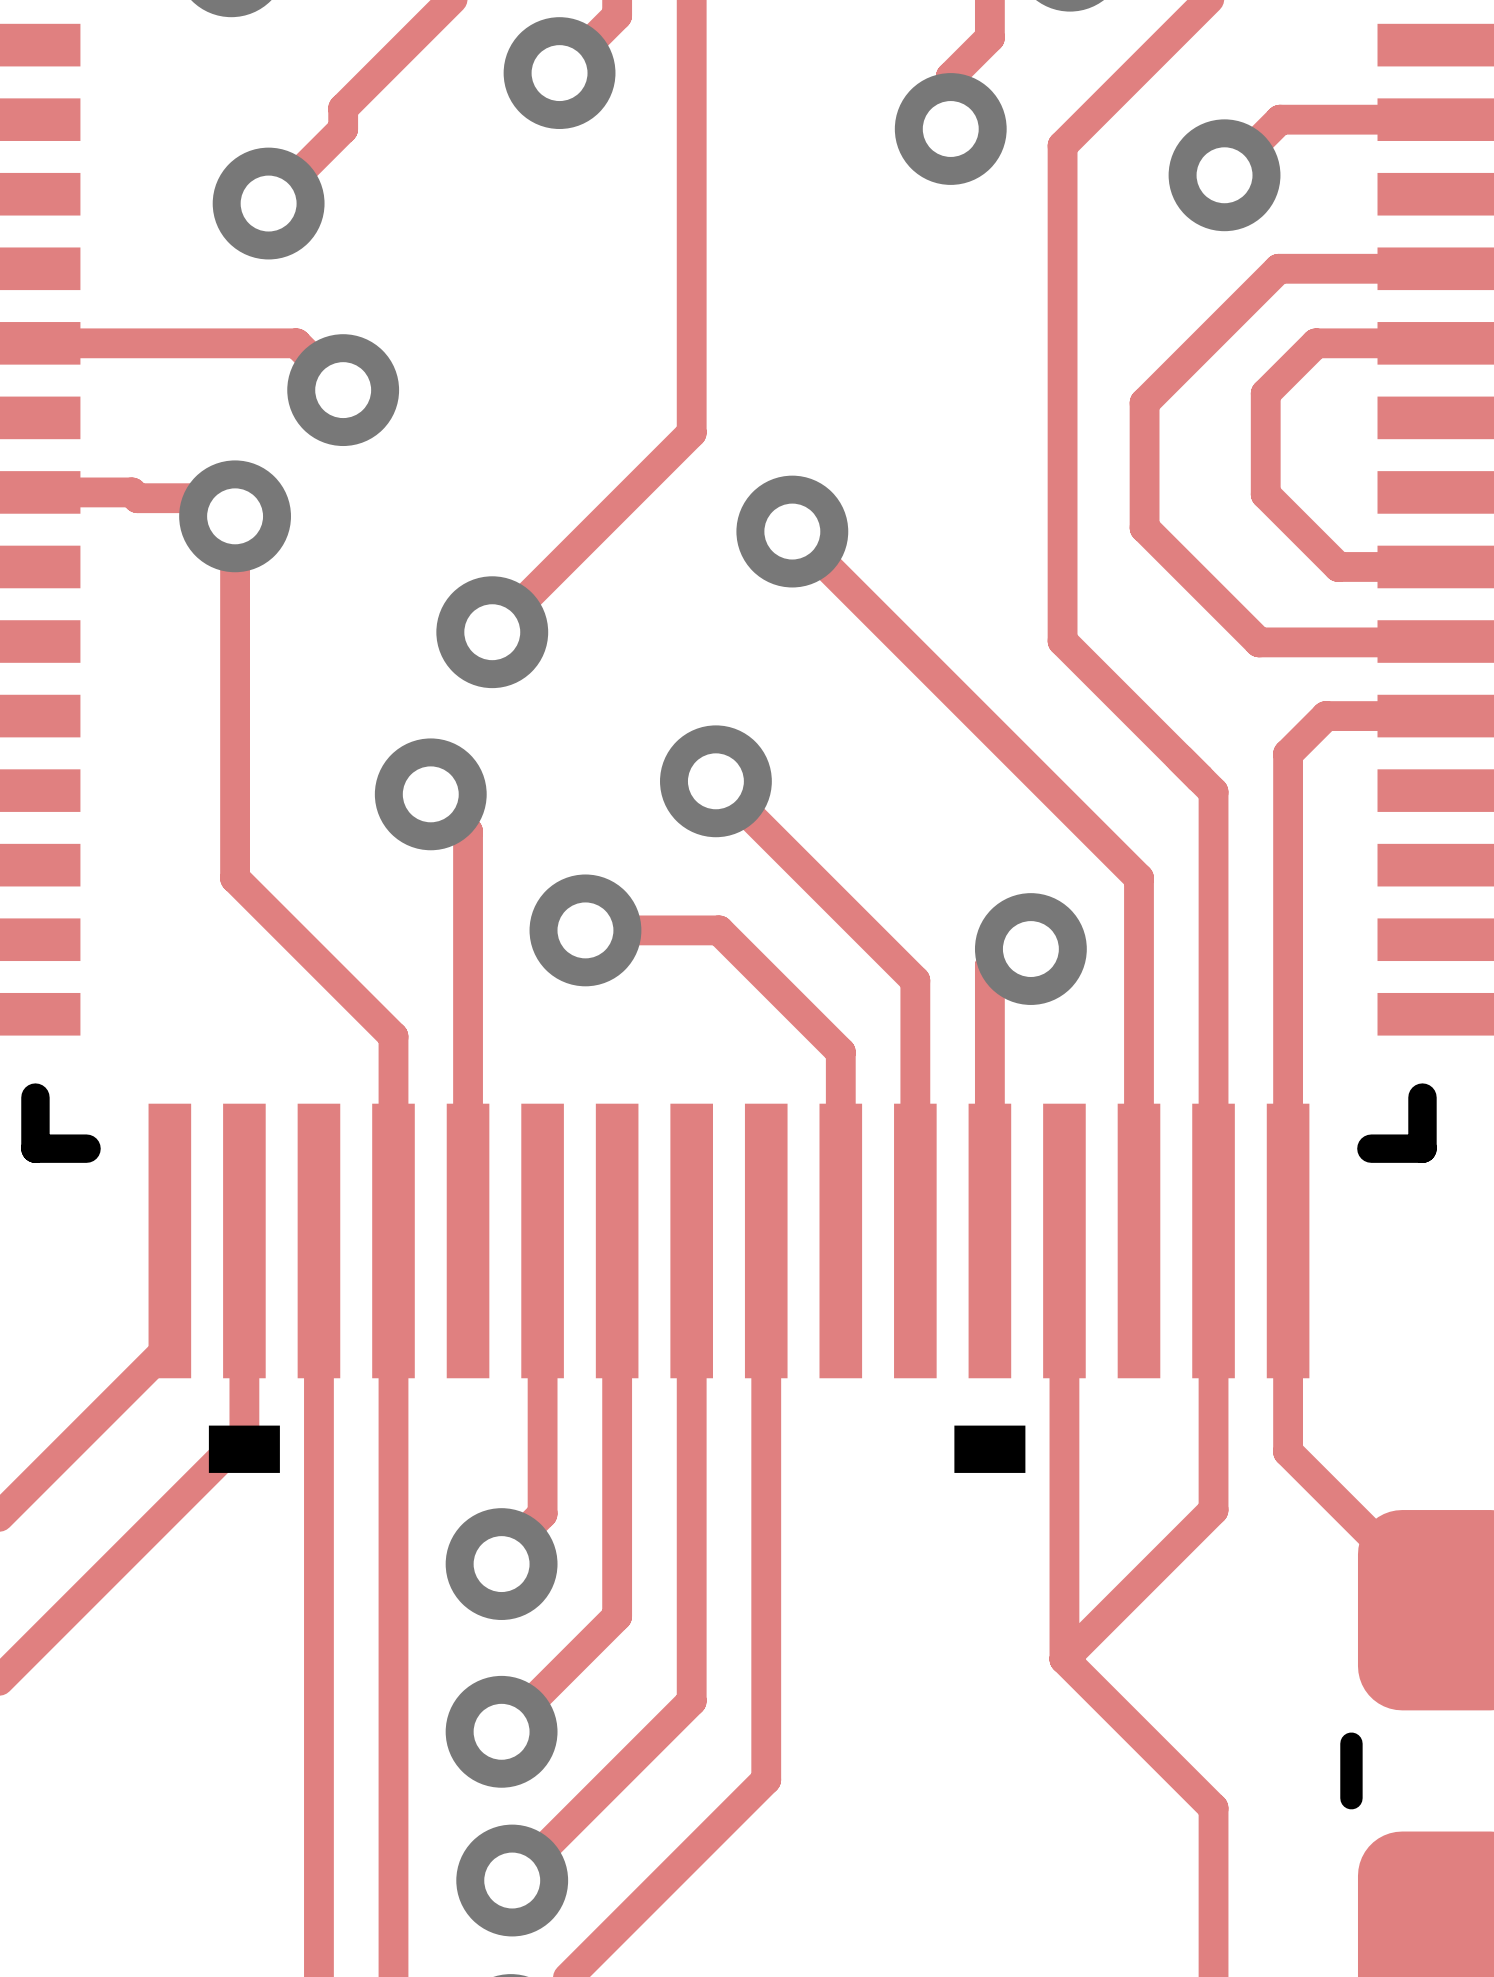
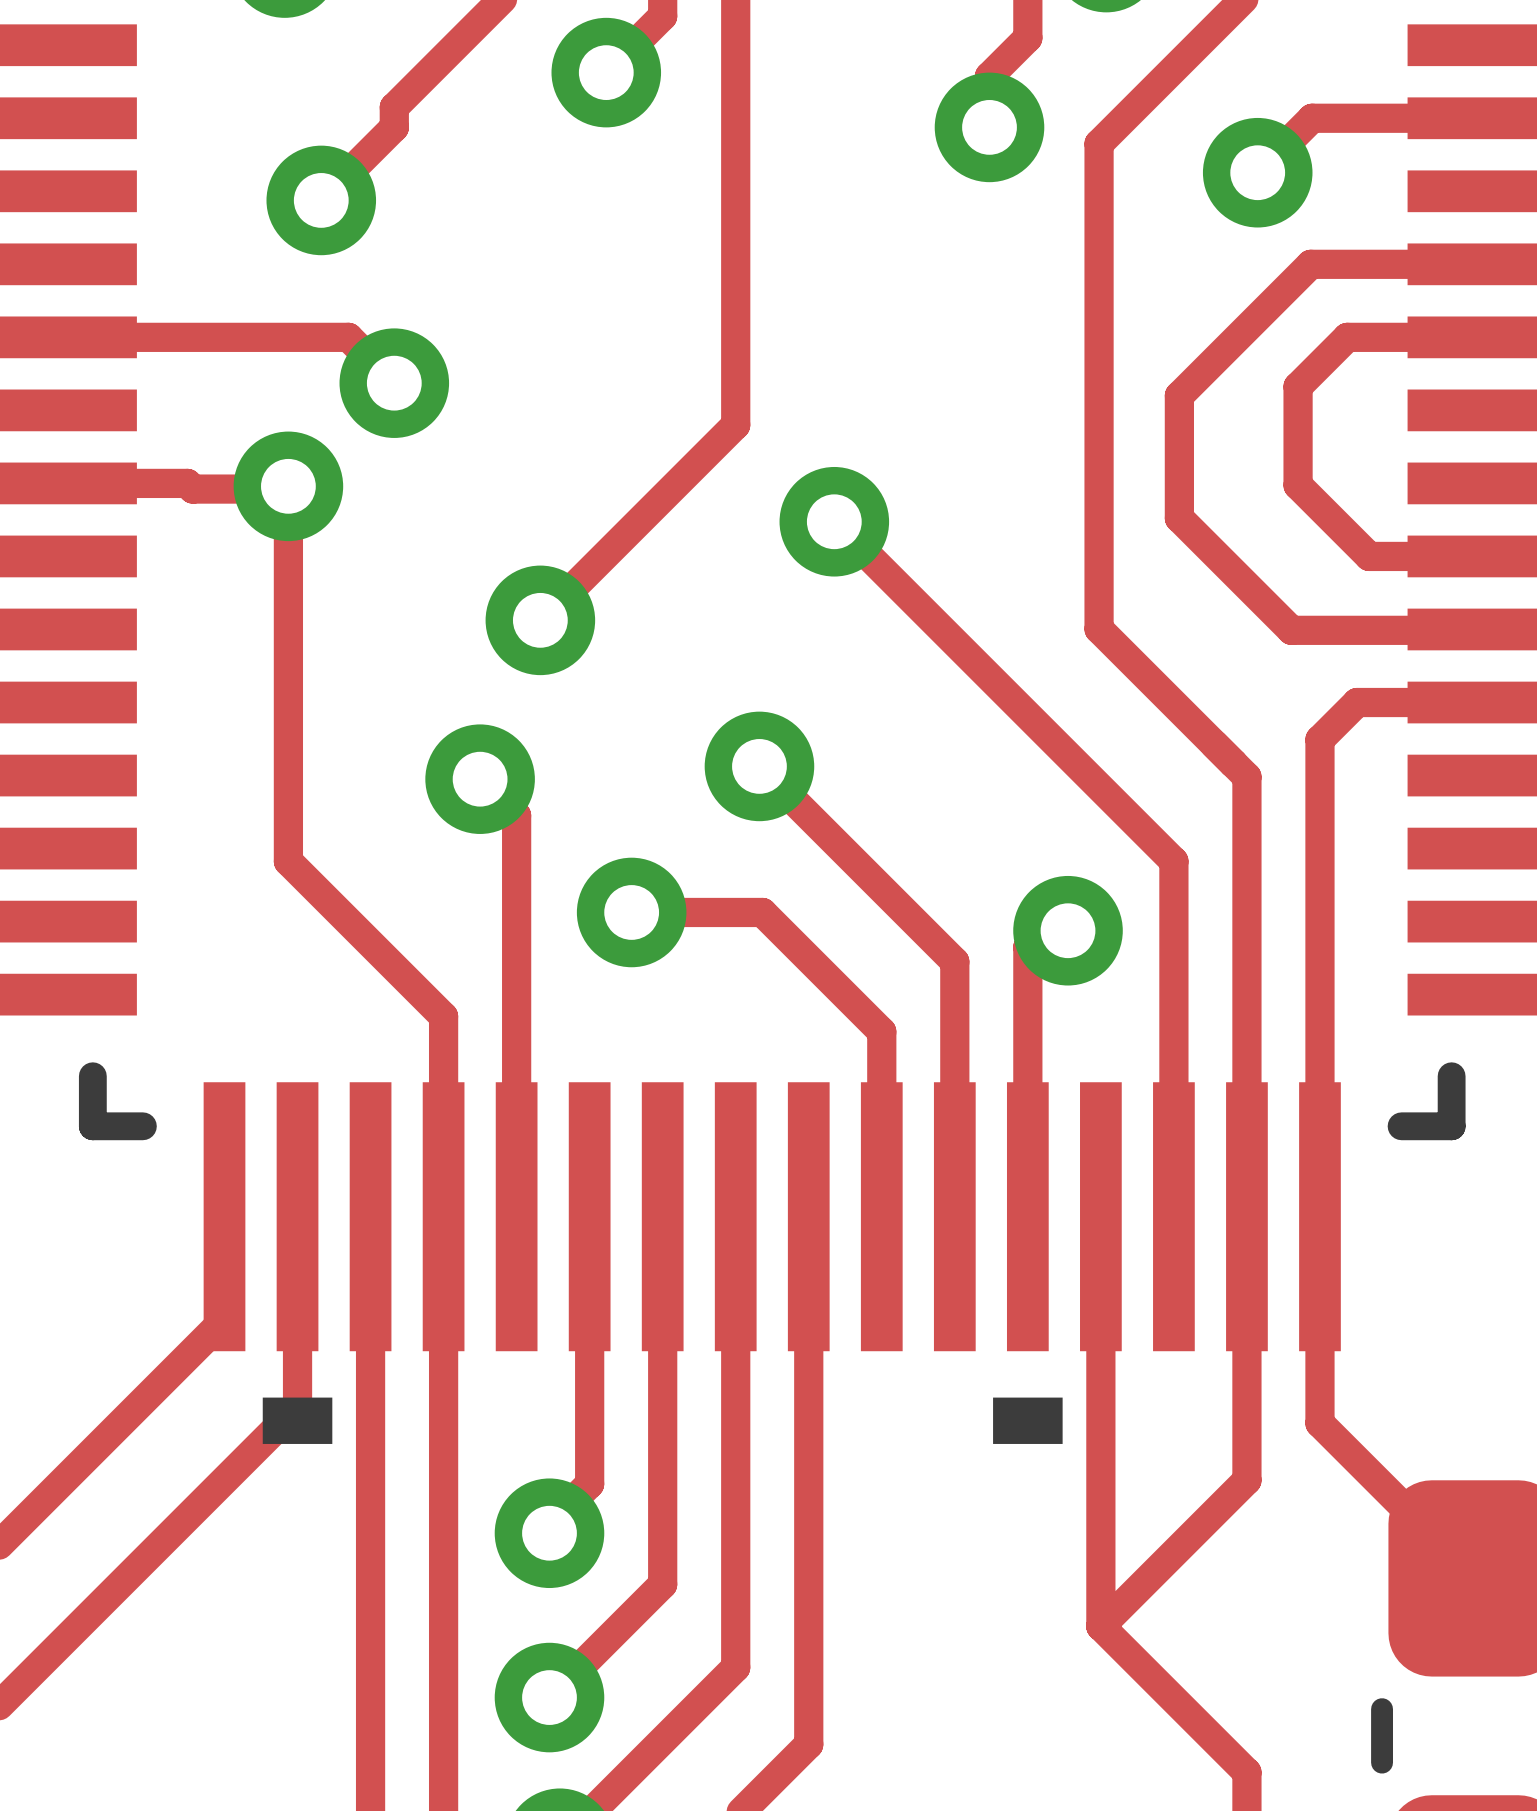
via position: (235, 516) -> (288, 486)

